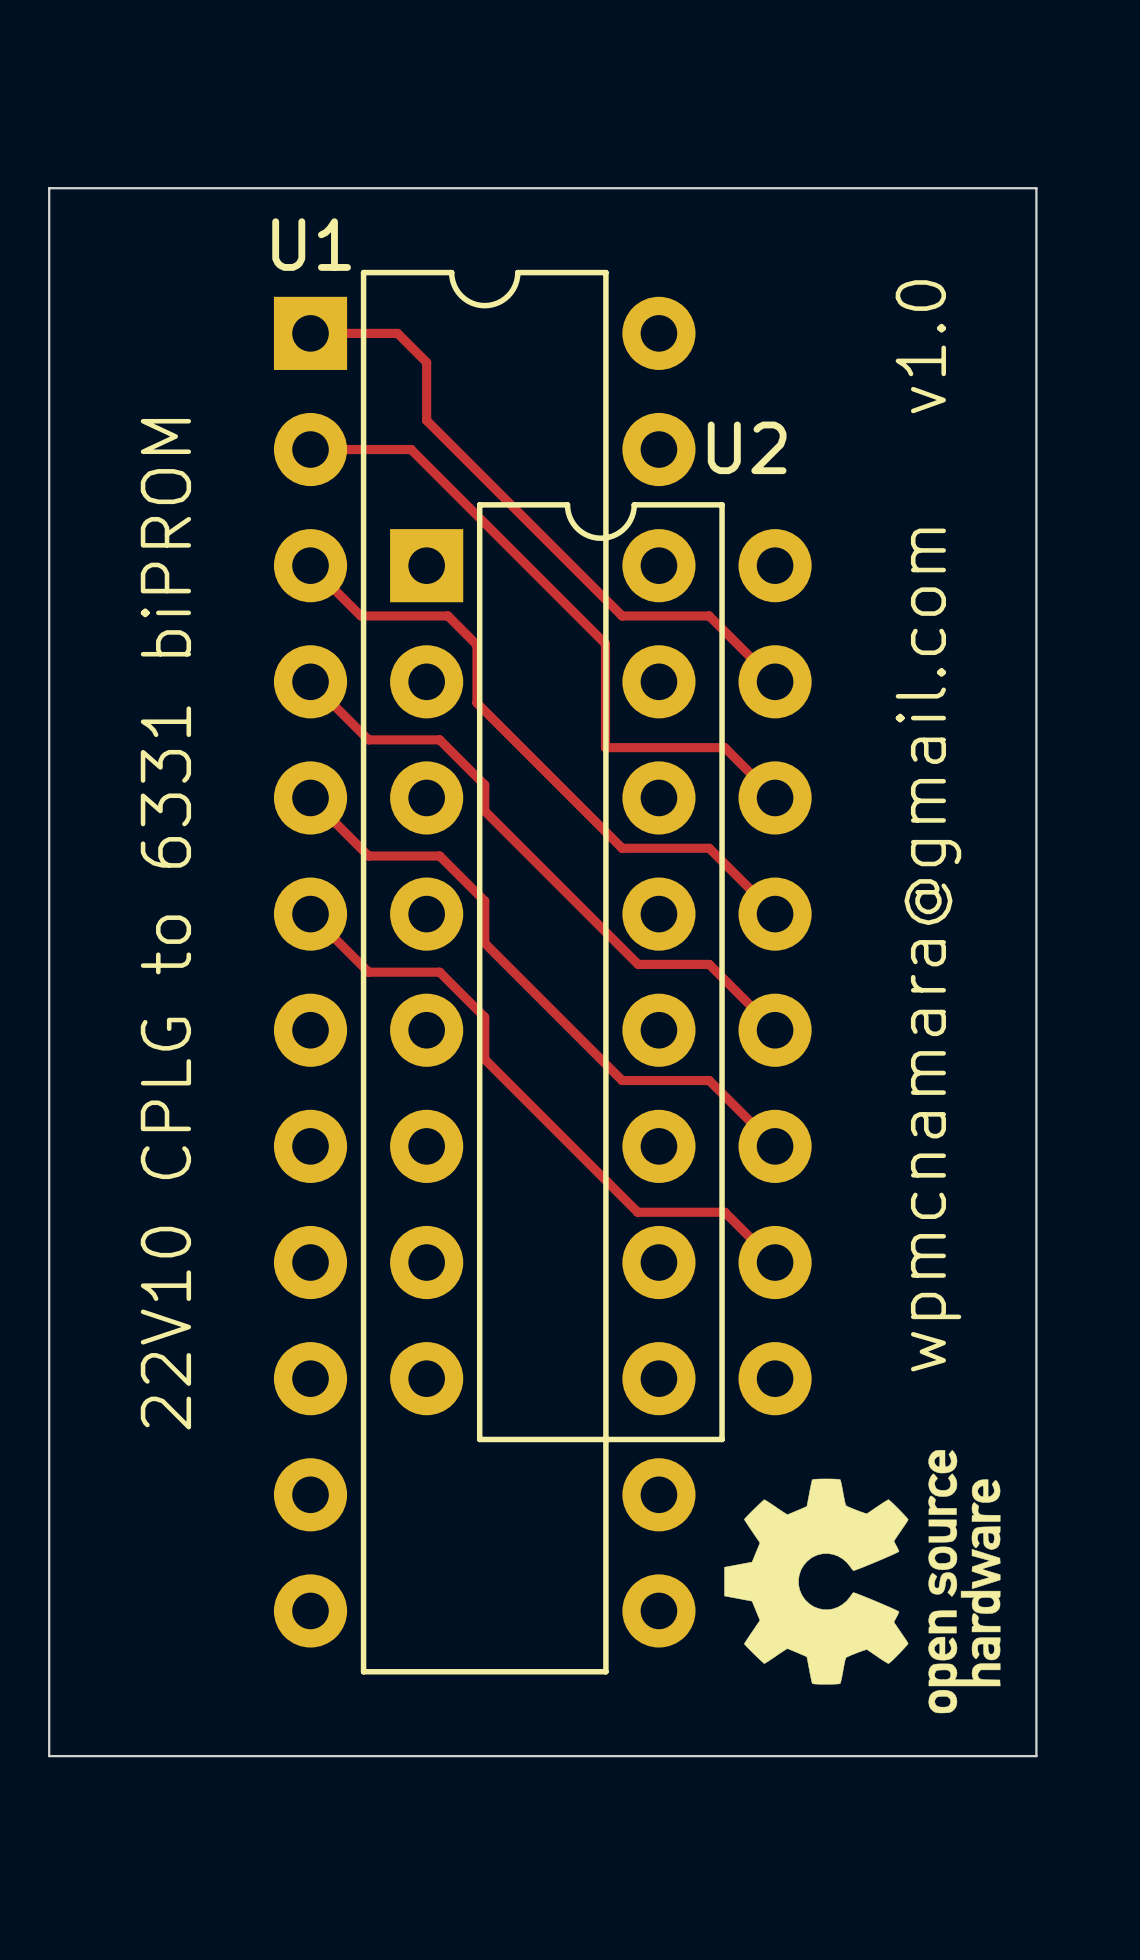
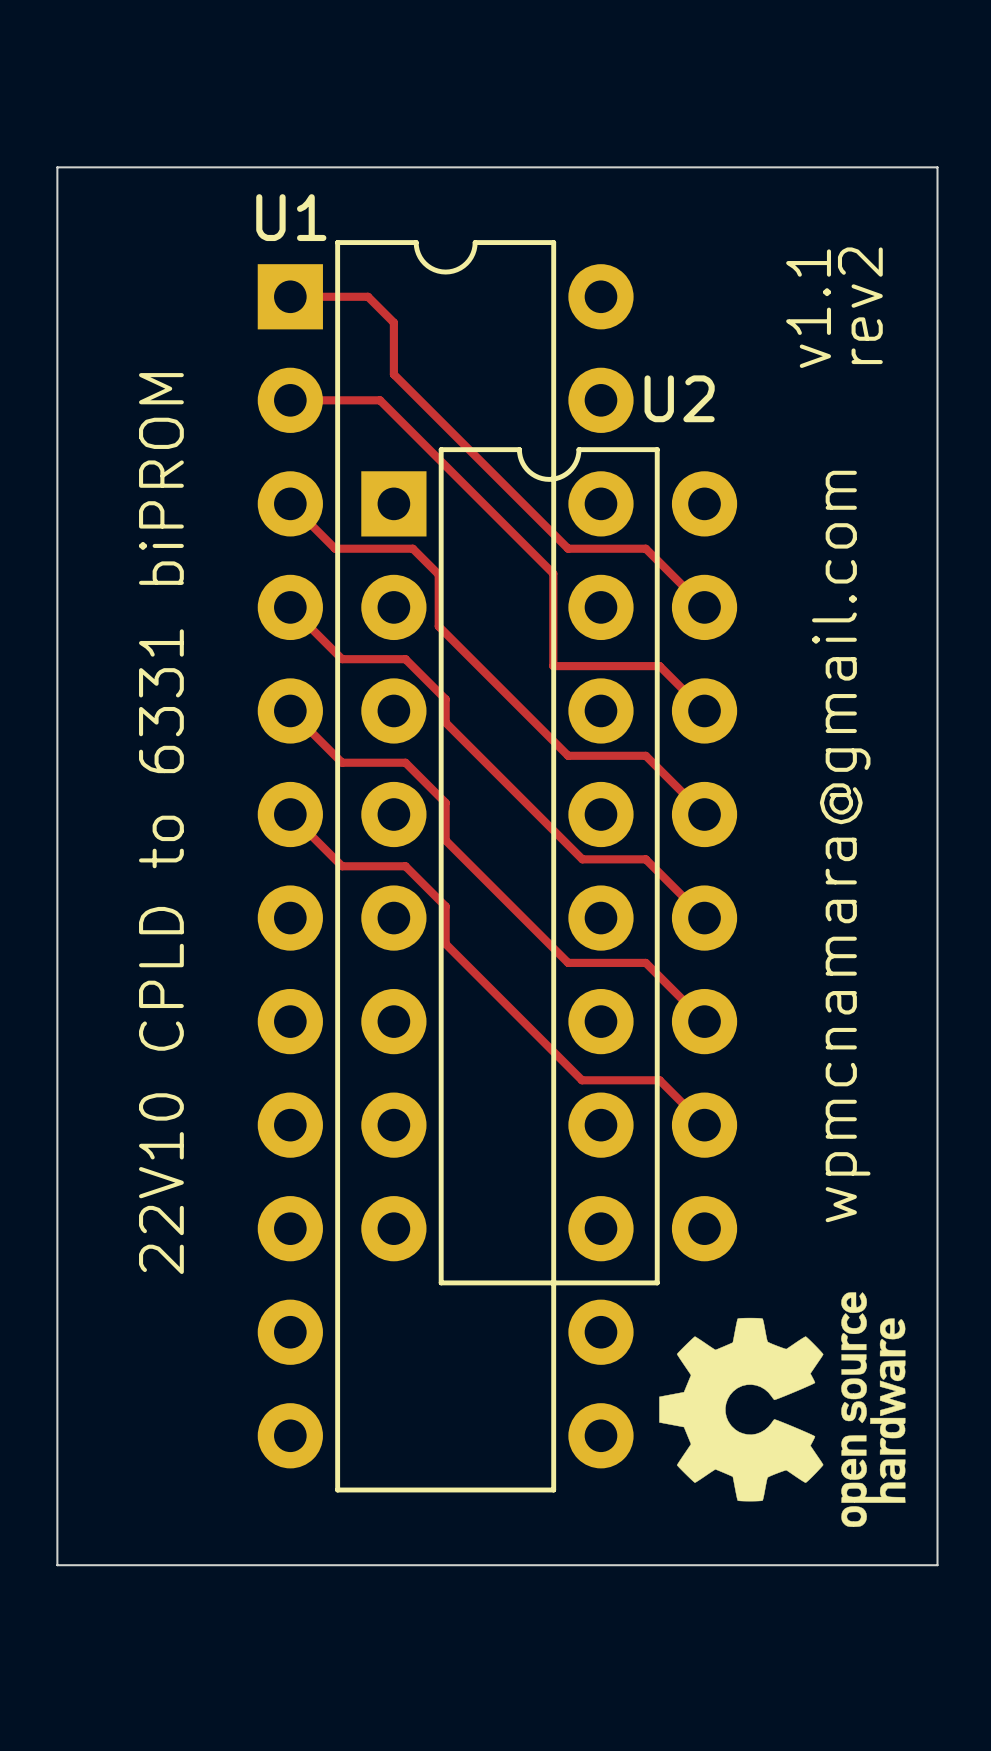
text: none -> rev2 (860, 305)
text: v1.0 (920, 346) -> v1.1 (808, 308)
text: 22V10 CPLG to 6331 biPROM (165, 924) -> 22V10 CPLD to 6331 biPROM (161, 823)

